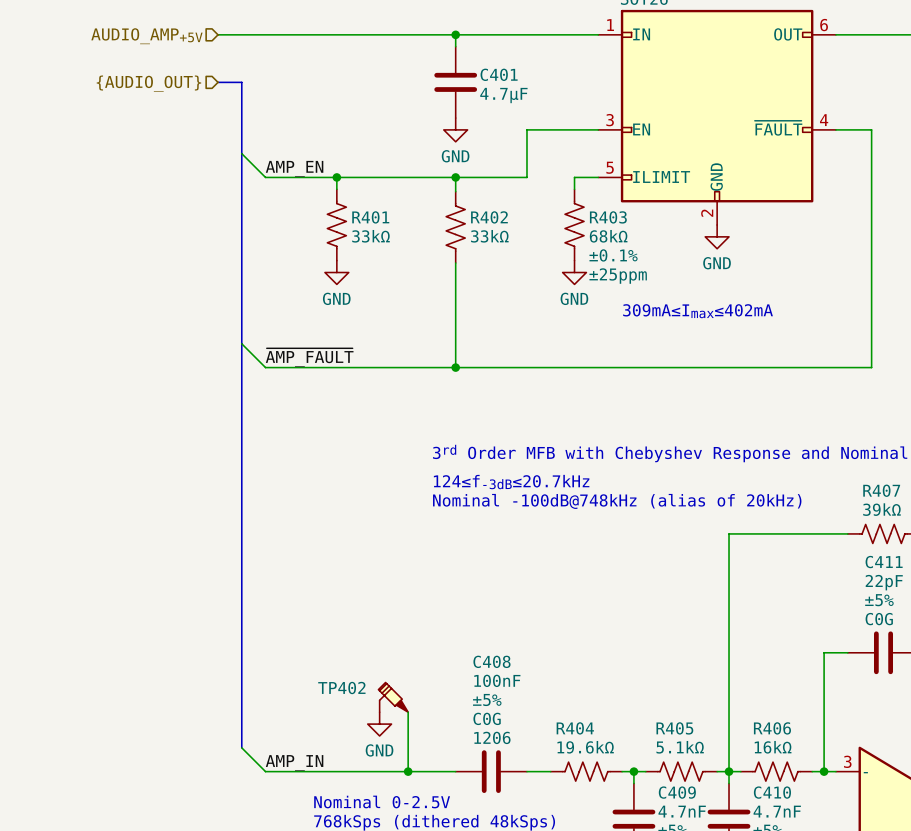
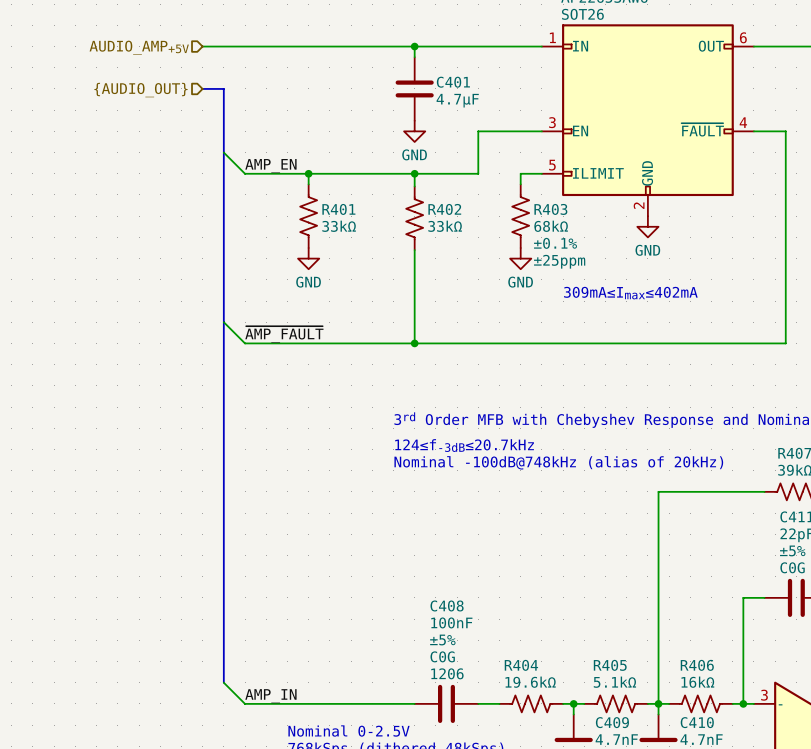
TP402: (393, 697) -> none
wire: (408, 712) (408, 771) -> none
power symbol: GND (379, 724) -> none
junction: (408, 771) -> none

